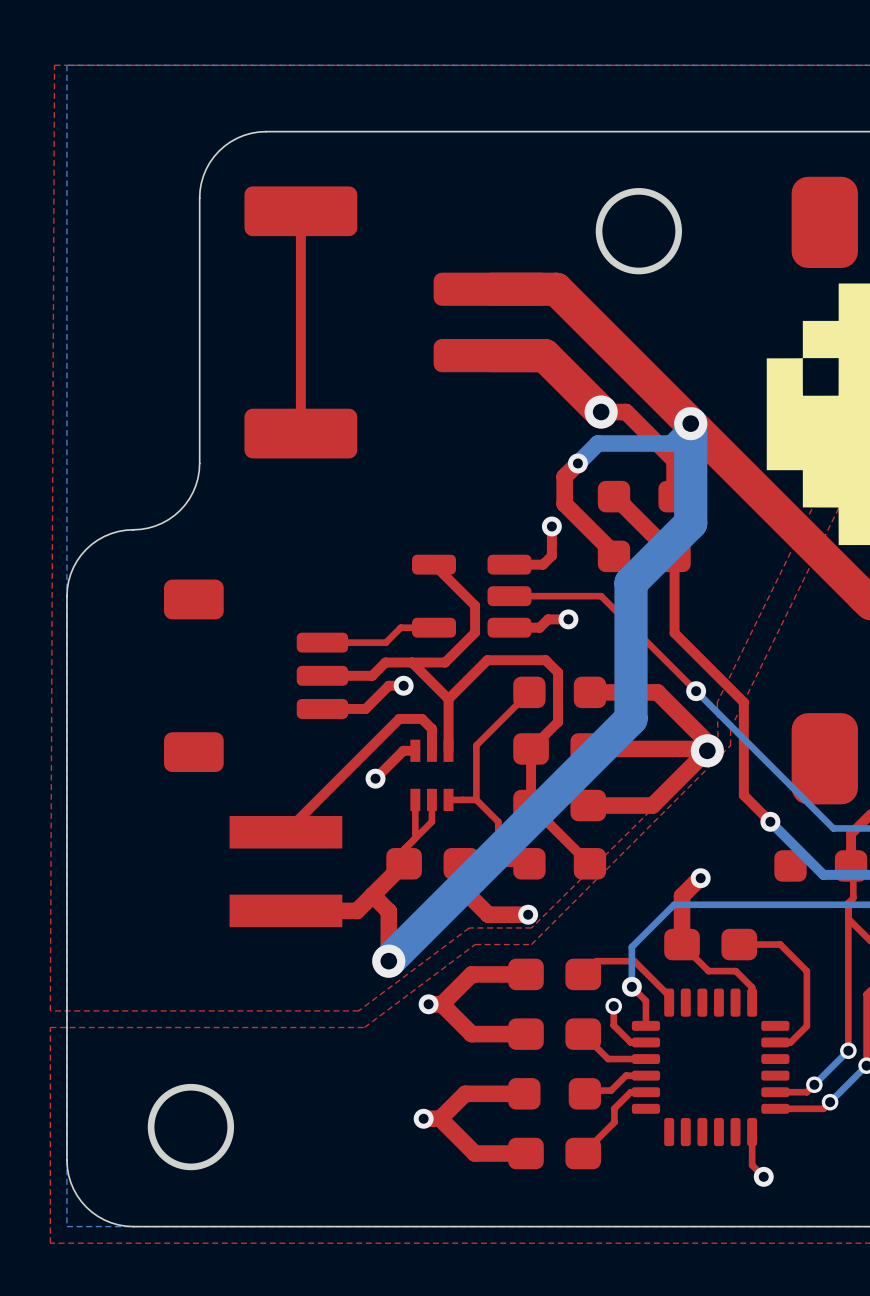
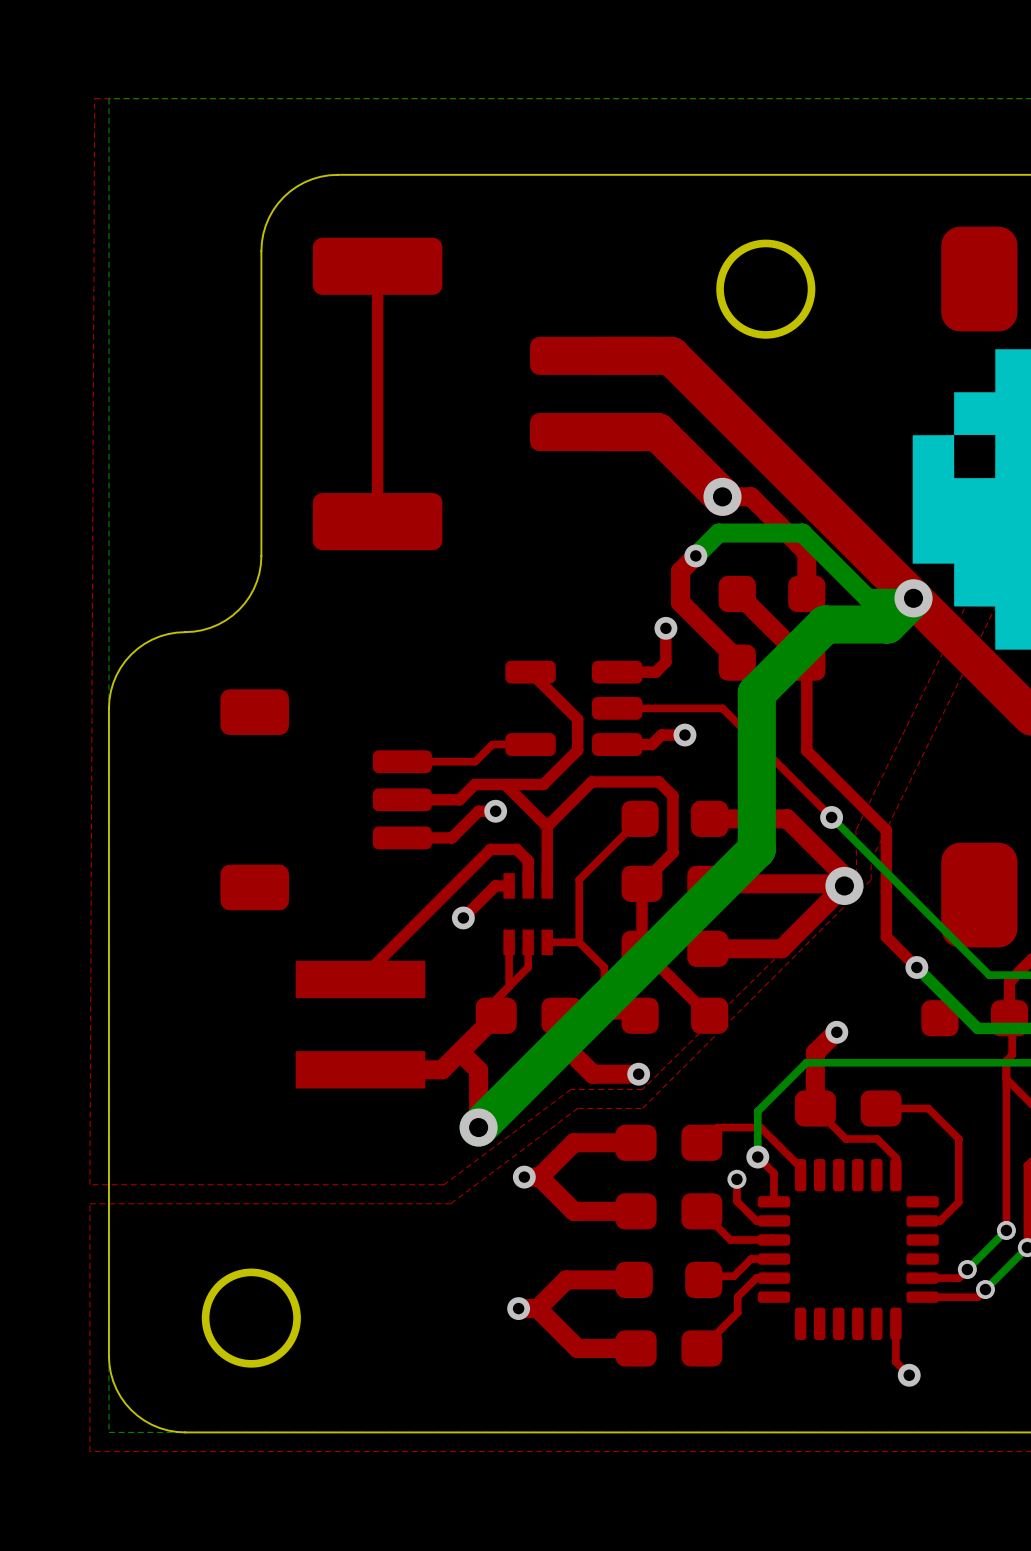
via position: (690, 423) -> (913, 598)
bottom track: (670, 443) (690, 423) (690, 523) -> (802, 533) (867, 598) (913, 598) (887, 624) (825, 624)

